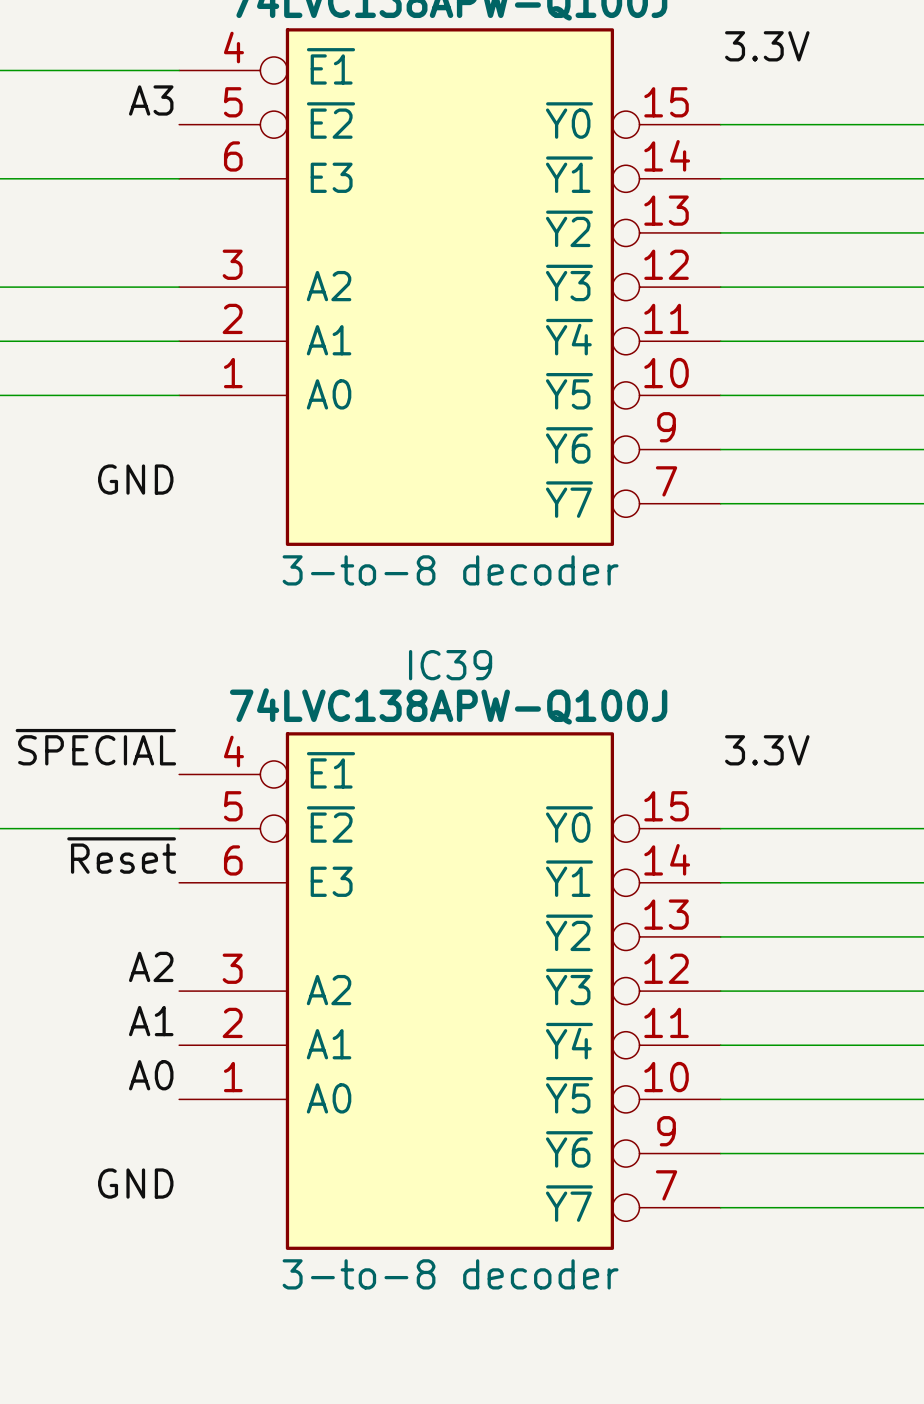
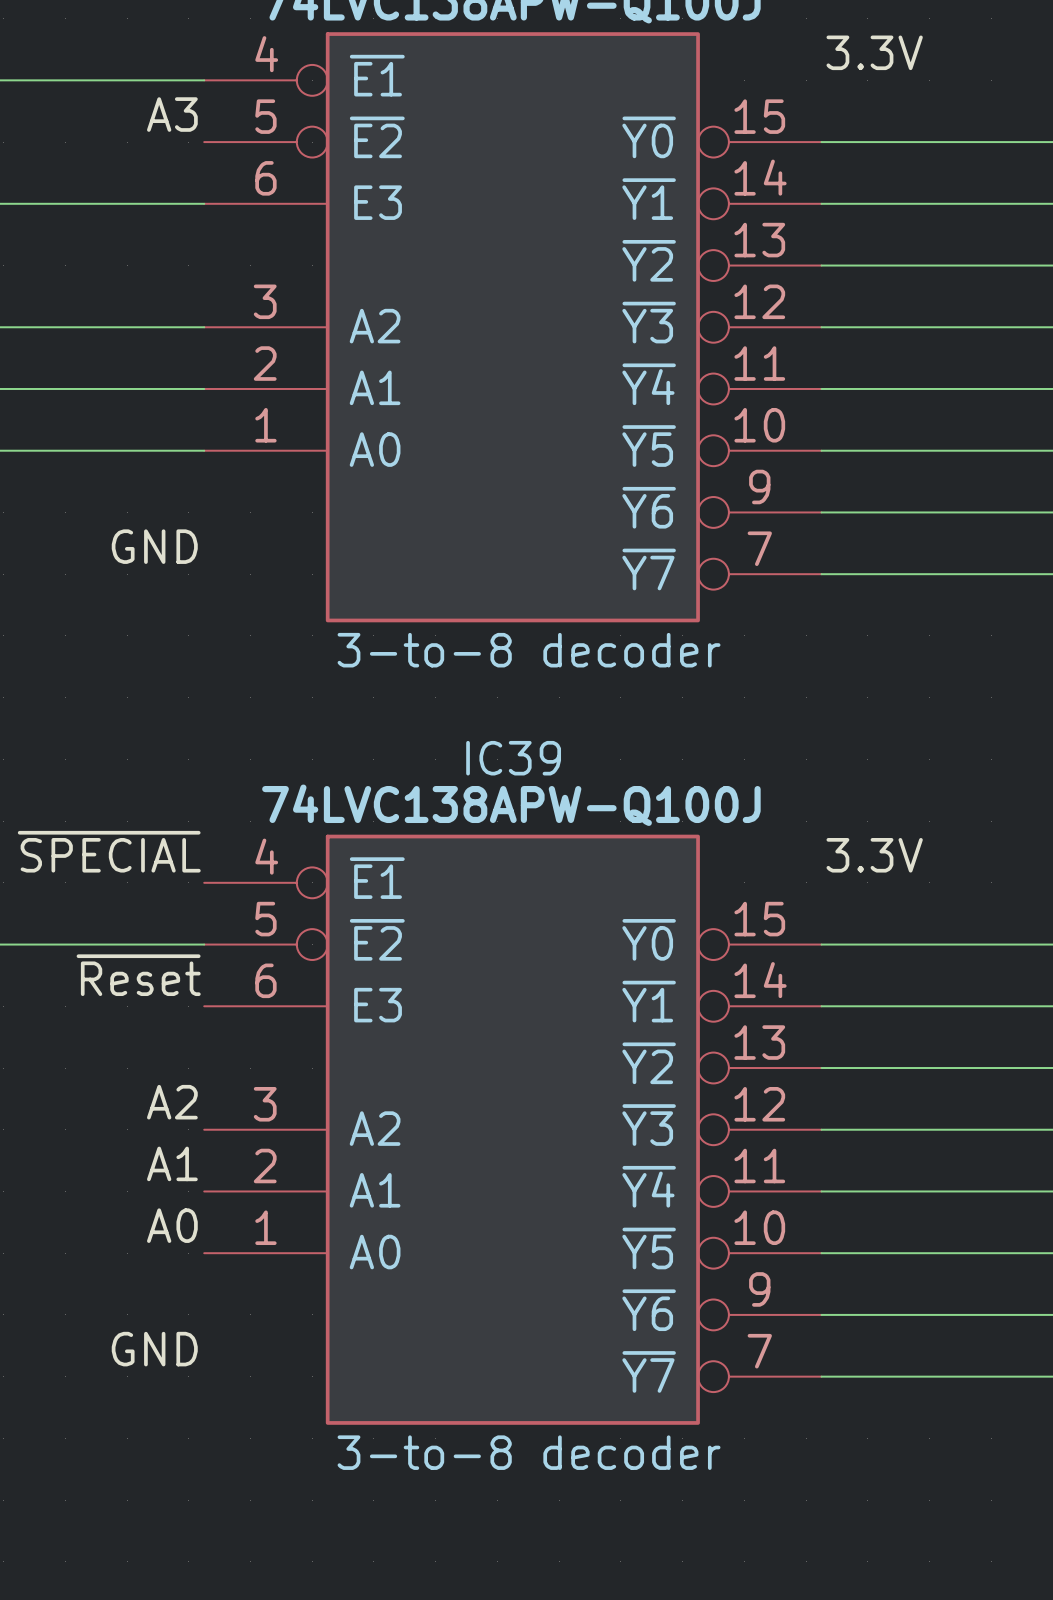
part text position: 3-to-8 decoder (450, 570) -> 3-to-8 decoder (529, 650)
IC39 text position: 3-to-8 decoder (450, 1274) -> 3-to-8 decoder (529, 1452)

